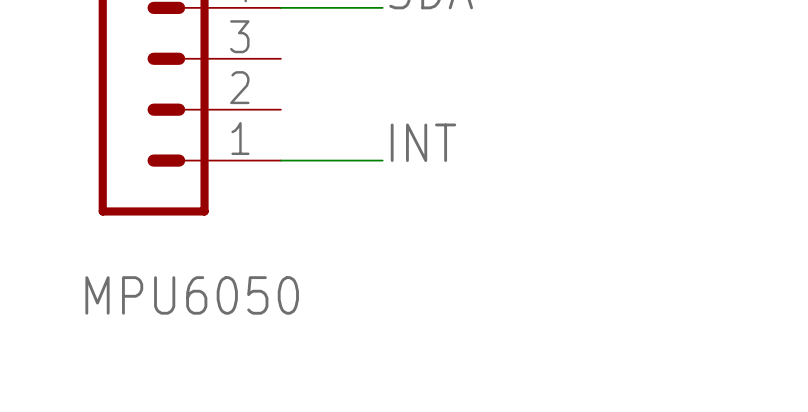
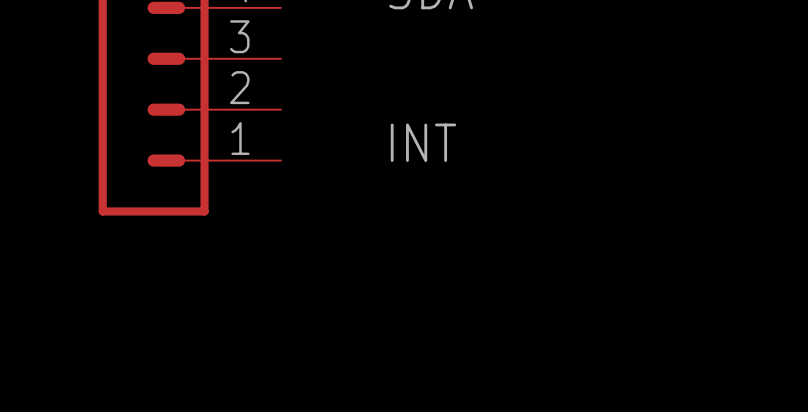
wire: (280, 7) (382, 7) -> none
wire: (280, 160) (382, 160) -> none
text: MPU6050 (192, 295) -> none

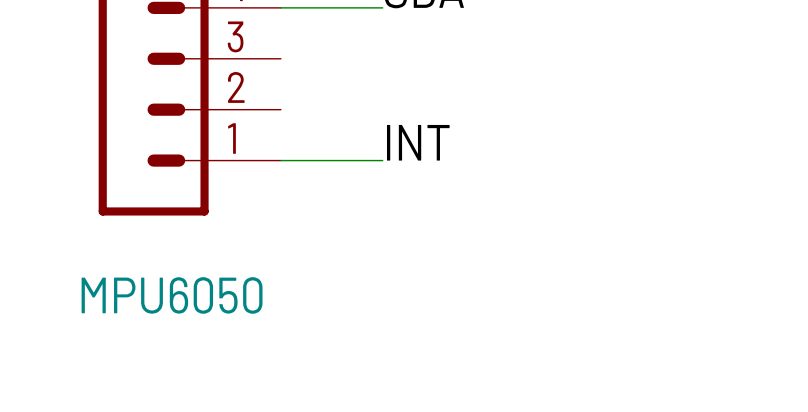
wire: none -> (280, 7) (382, 7)
wire: none -> (280, 160) (382, 160)
text: none -> MPU6050 (172, 295)

